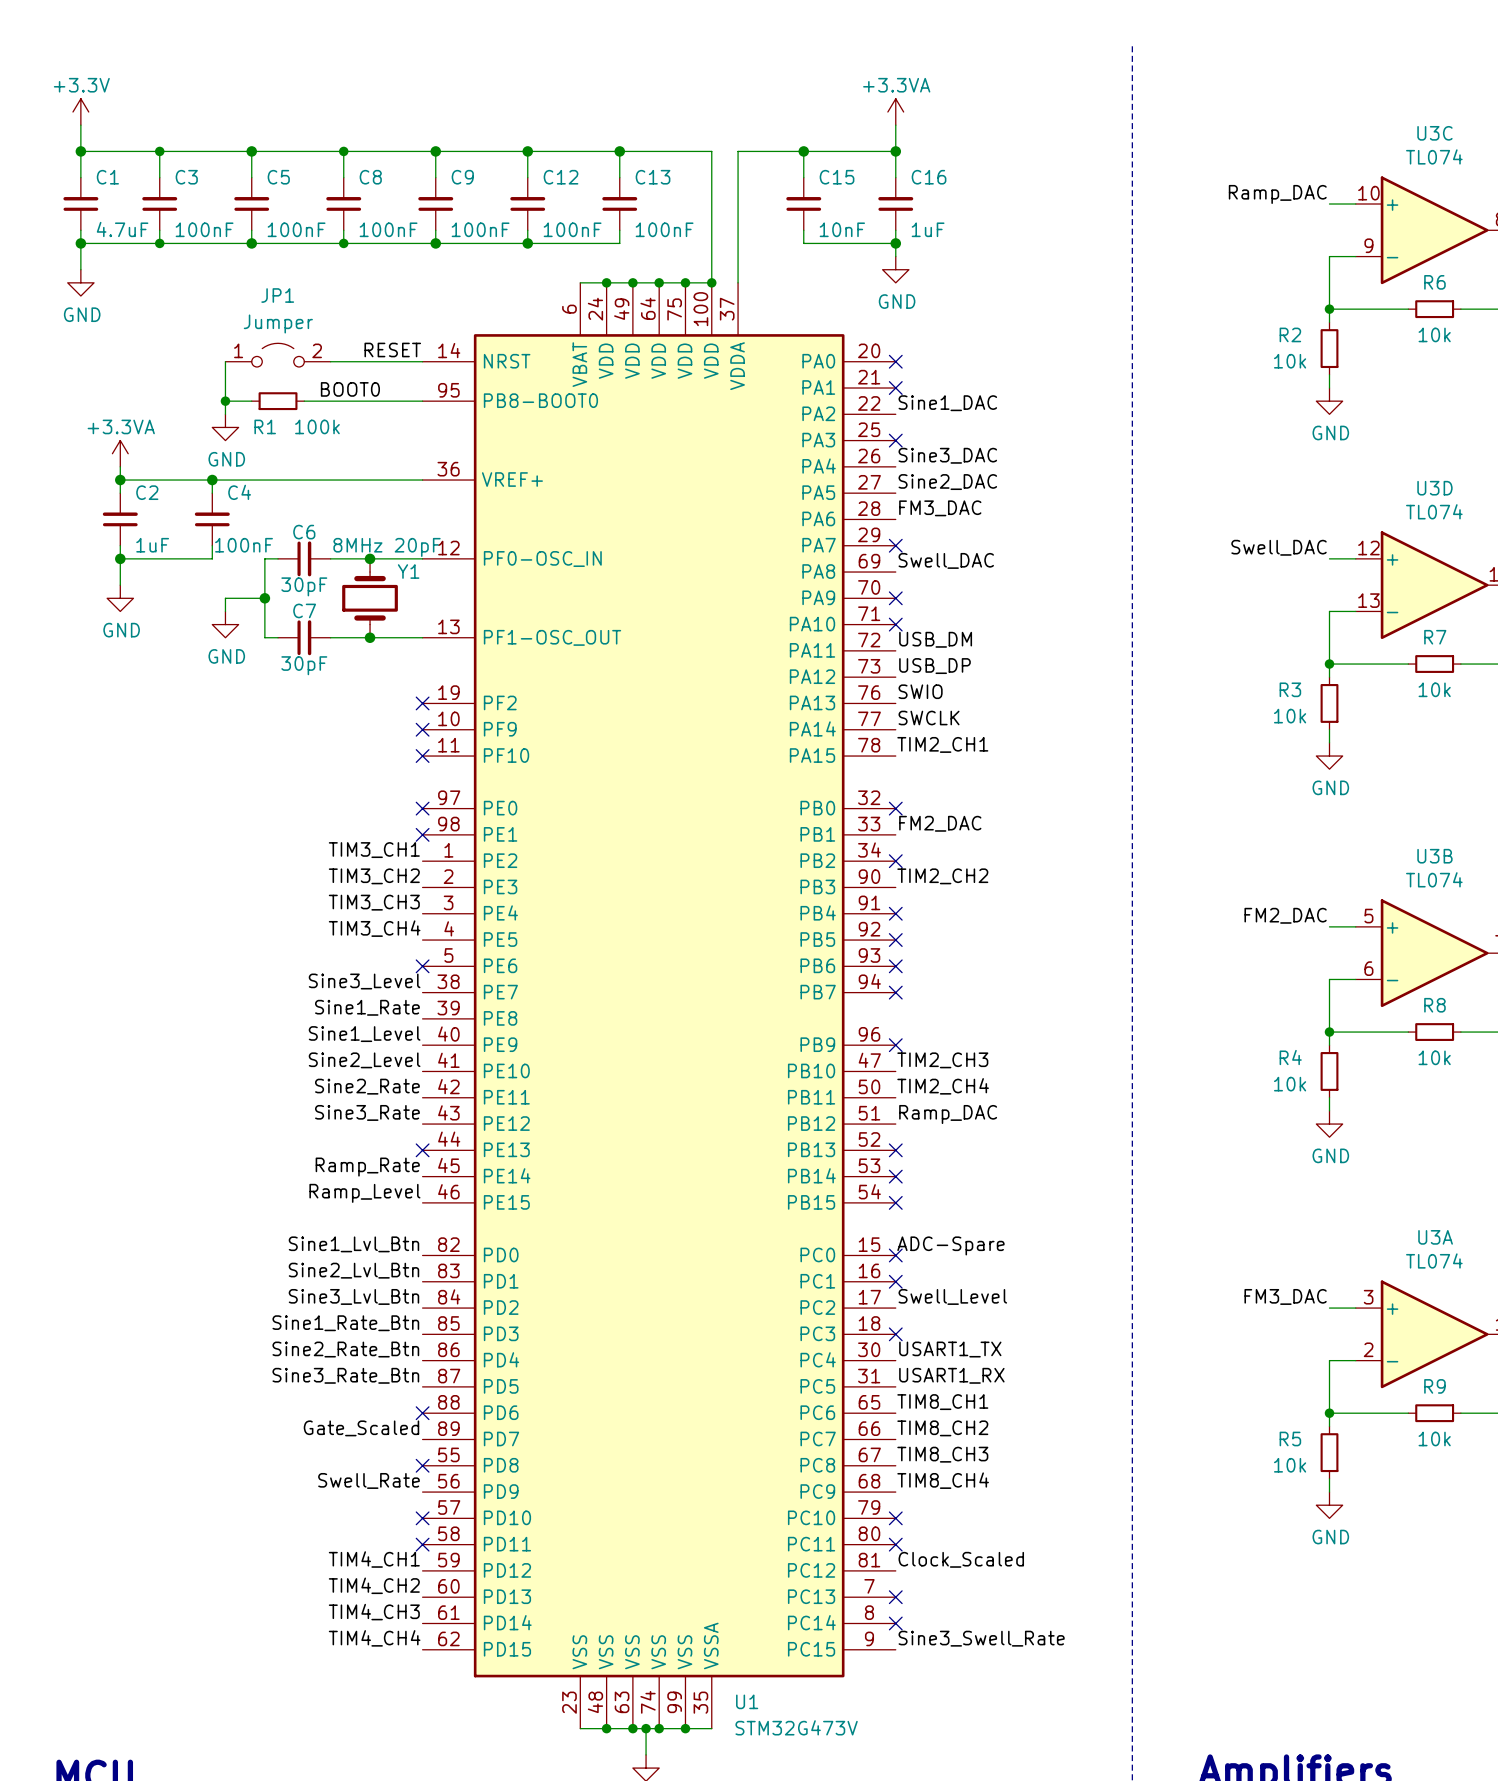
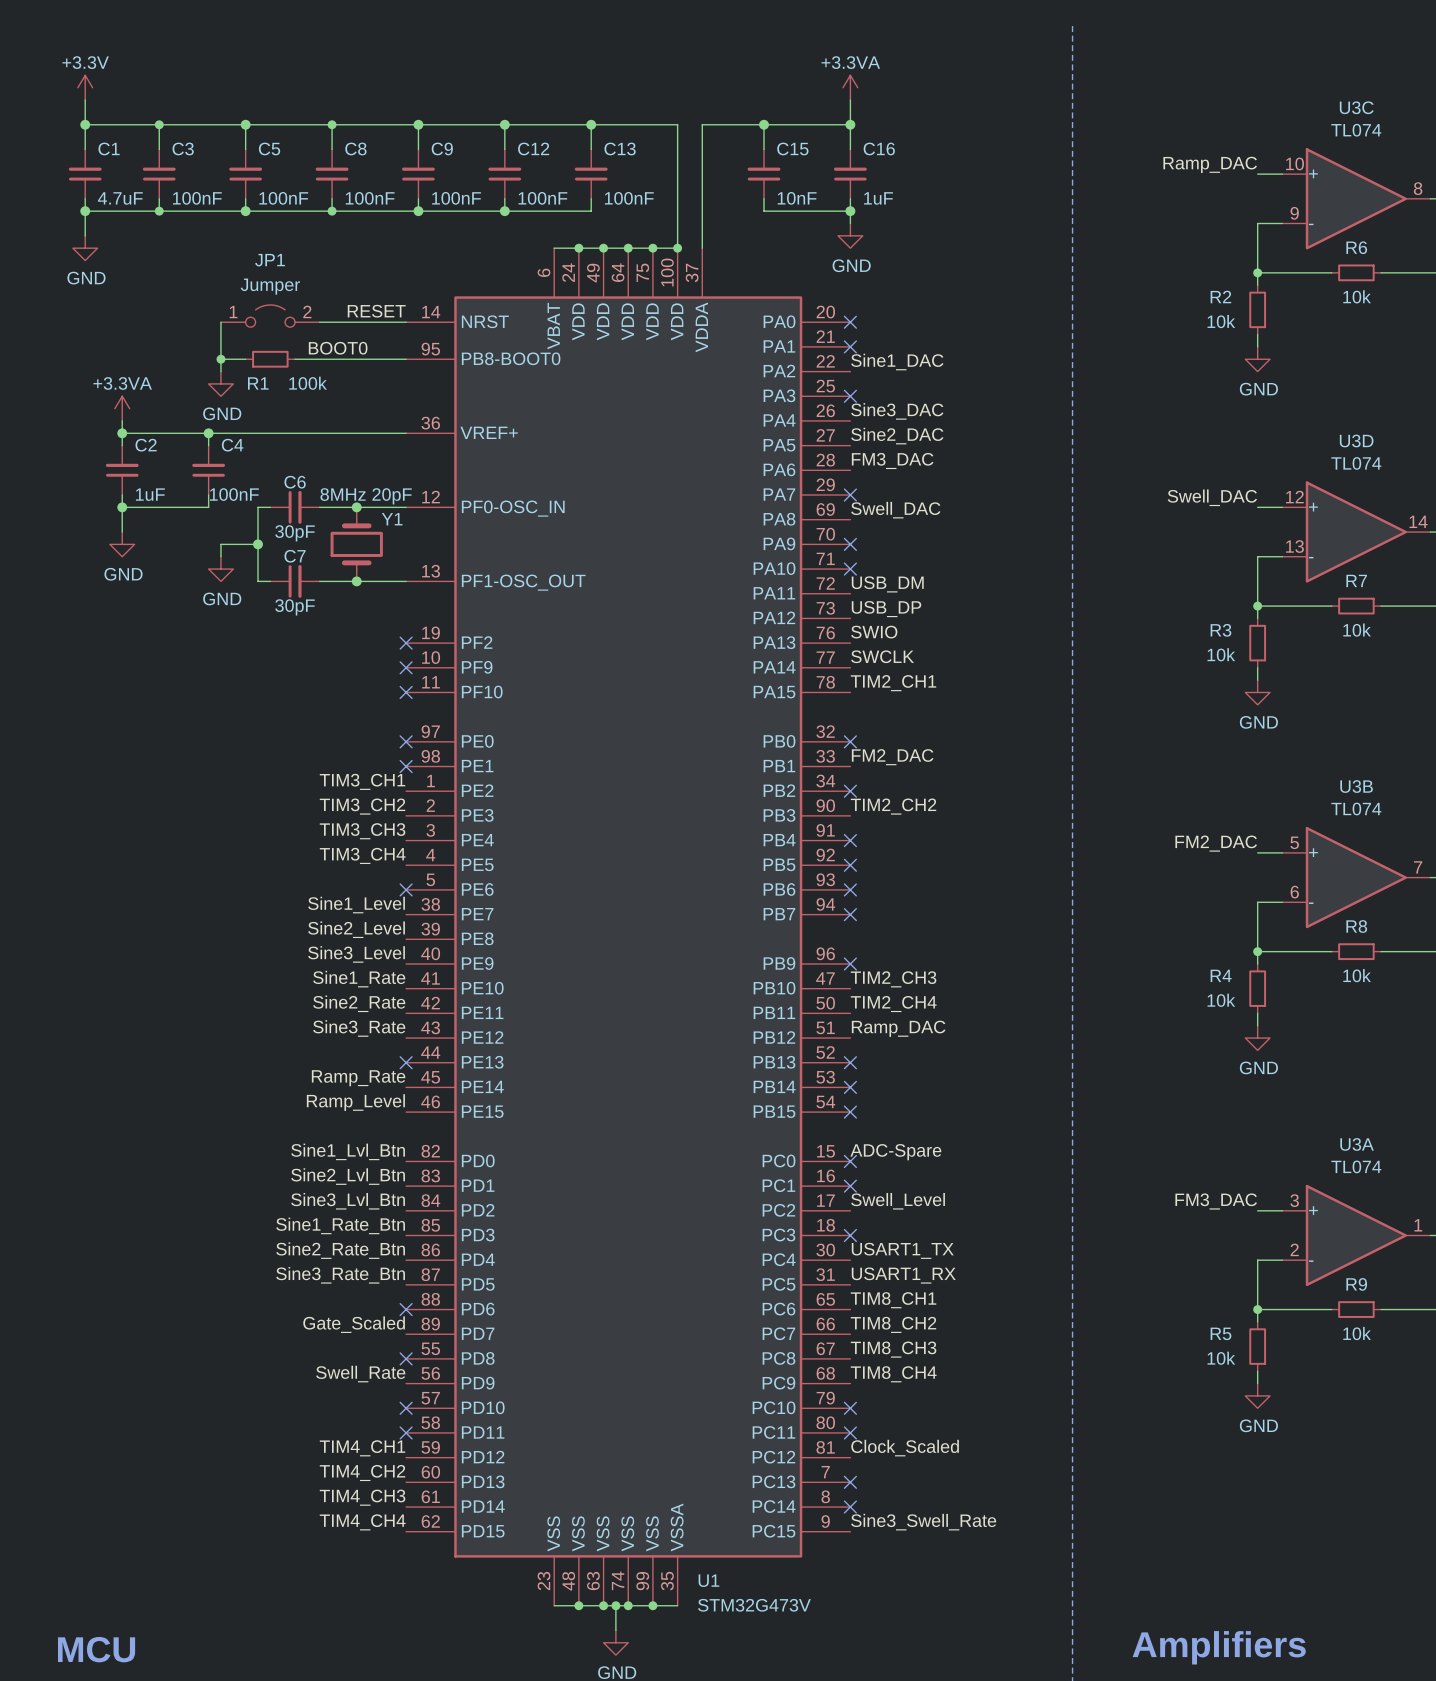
label: Sine3_Level (364, 981) -> Sine1_Level (356, 905)
label: Sine1_Rate (367, 1007) -> Sine2_Level (356, 929)
label: Sine1_Level (364, 1034) -> Sine3_Level (356, 954)
label: Sine2_Level (364, 1060) -> Sine1_Rate (359, 979)

